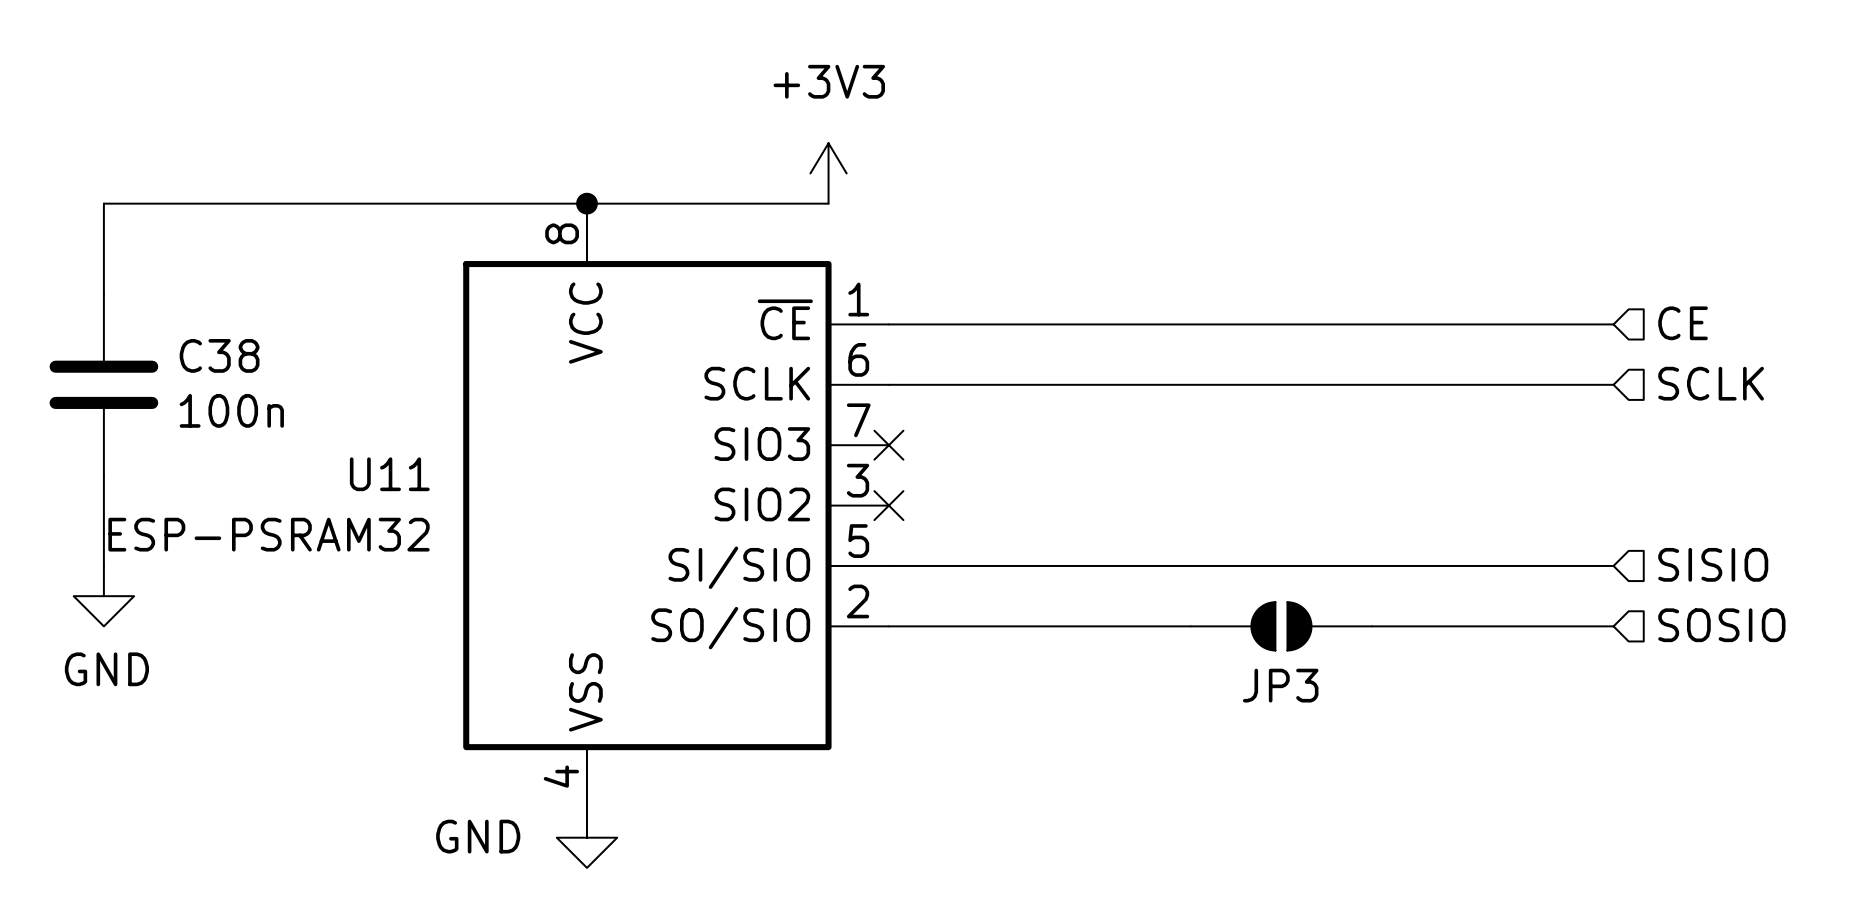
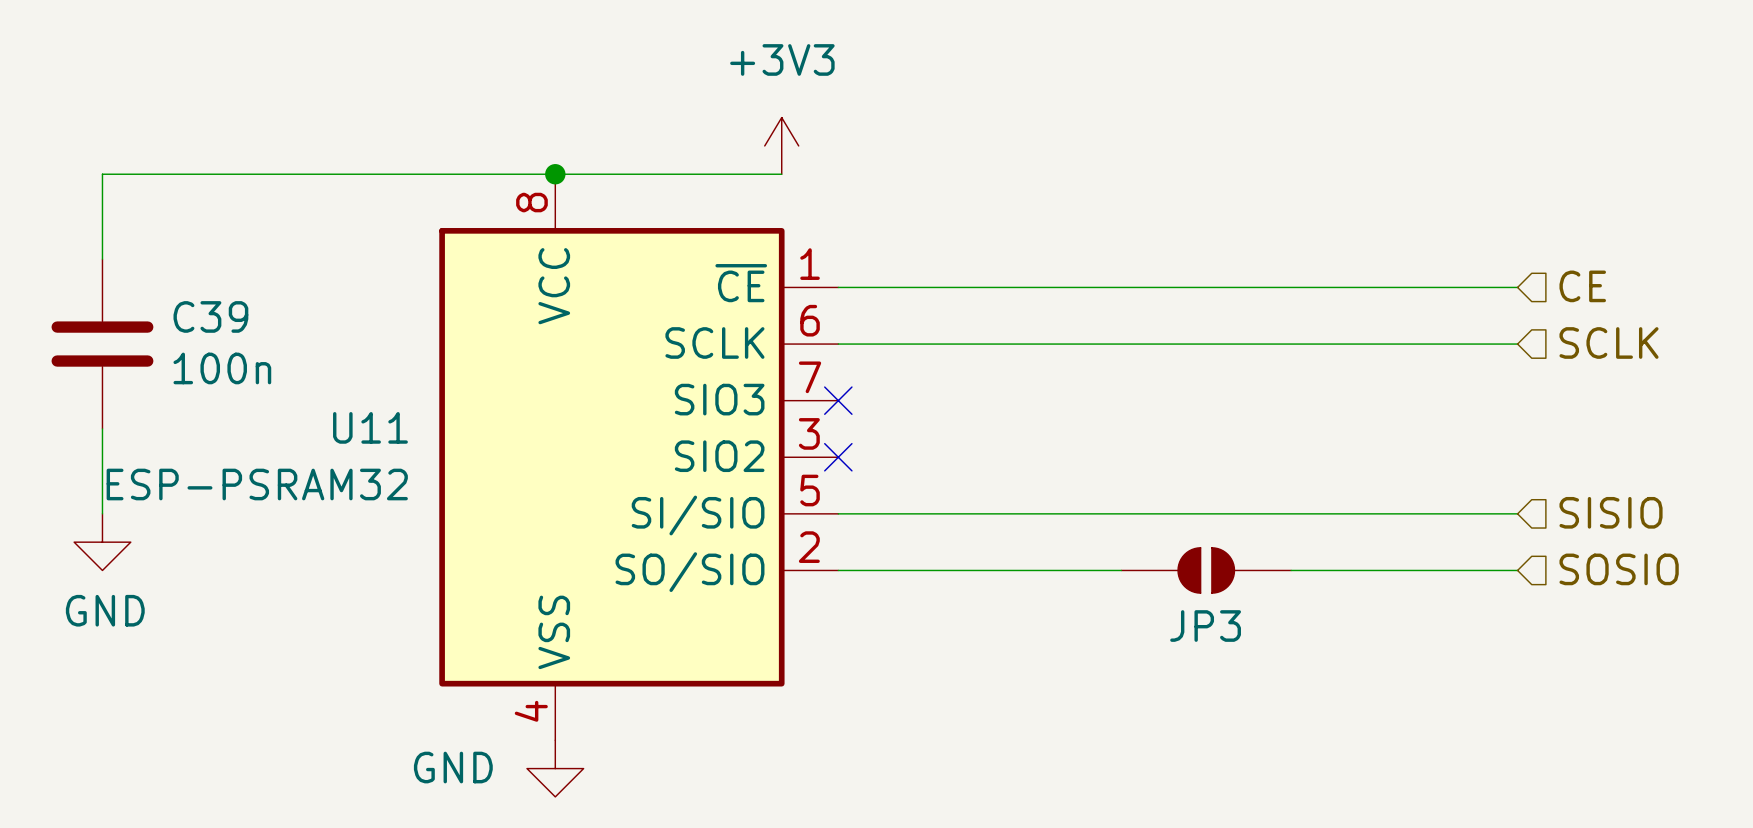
C38 name: C38 (219, 355) -> C39 (210, 316)

